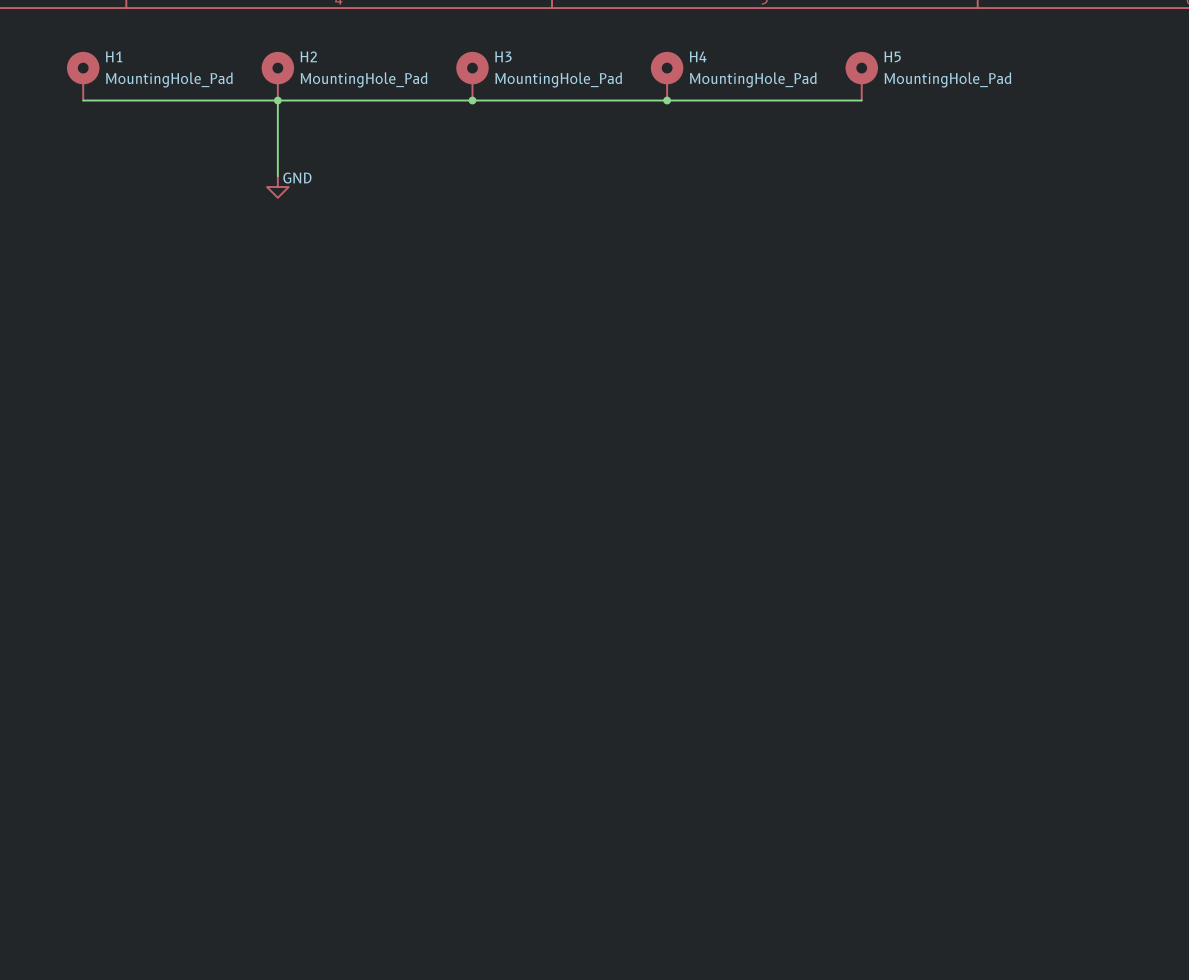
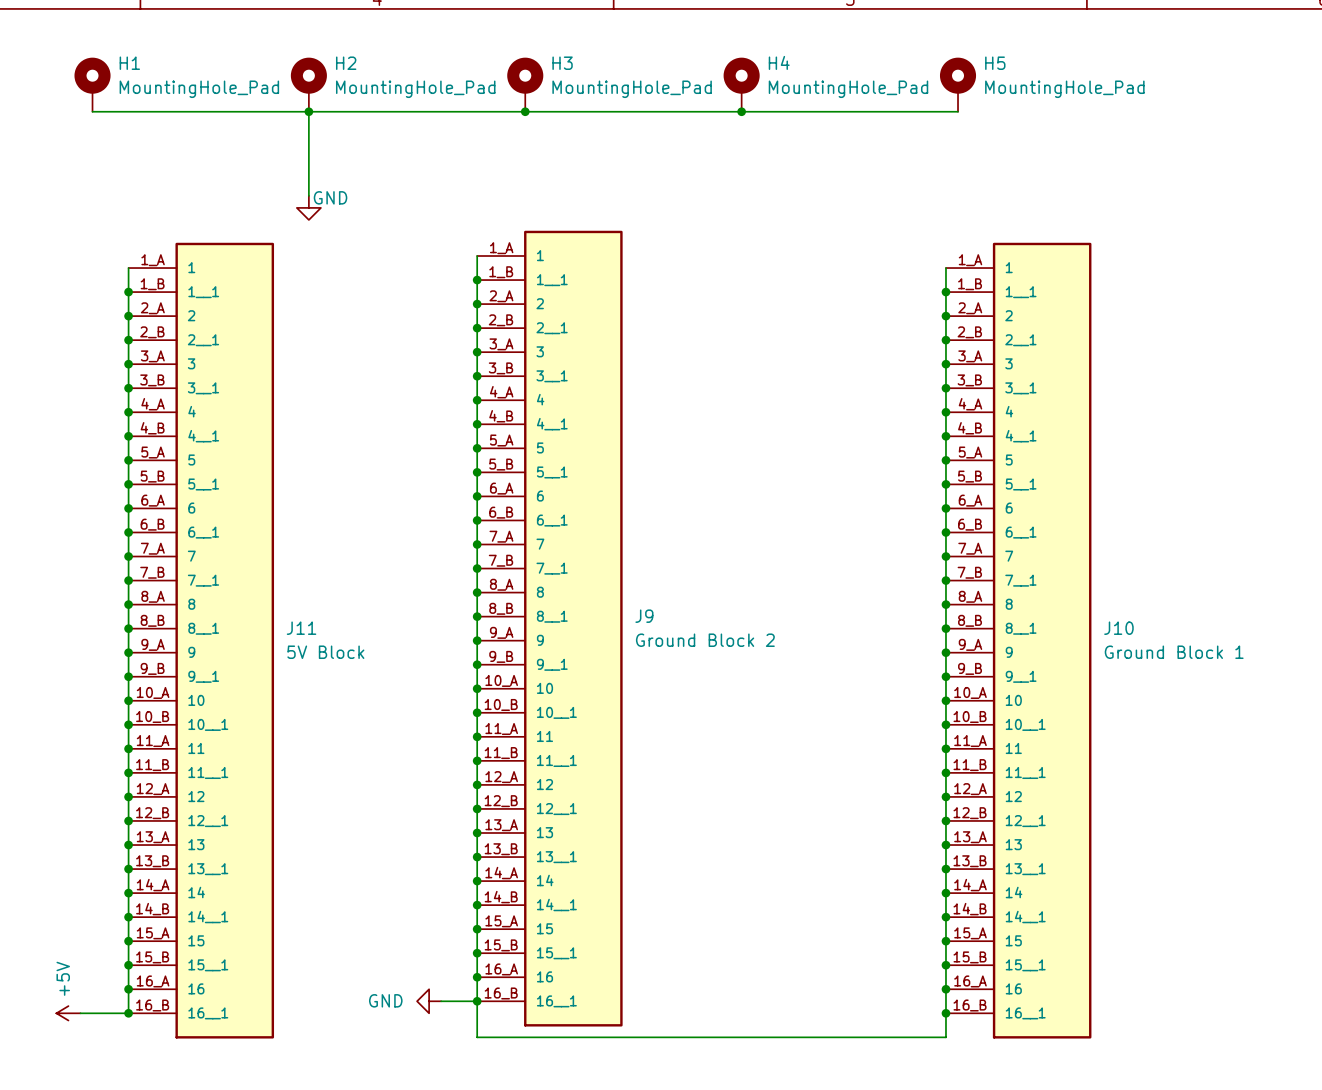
wire: none -> (477, 256) (477, 1037) (945, 1037) (945, 268)
wire: none -> (128, 268) (128, 1013) (80, 1013)
junction: none -> (477, 280)
junction: none -> (128, 292)
junction: none -> (945, 292)
junction: none -> (477, 304)
junction: none -> (128, 316)
junction: none -> (945, 316)
junction: none -> (477, 328)
junction: none -> (128, 340)
junction: none -> (945, 340)
junction: none -> (477, 352)
junction: none -> (128, 364)
junction: none -> (945, 364)
junction: none -> (477, 376)
junction: none -> (128, 388)
junction: none -> (945, 388)
junction: none -> (477, 400)
junction: none -> (128, 412)
junction: none -> (945, 412)
junction: none -> (477, 424)
junction: none -> (128, 436)
junction: none -> (945, 436)
junction: none -> (477, 448)
junction: none -> (128, 460)
junction: none -> (945, 460)
junction: none -> (477, 472)
junction: none -> (128, 484)
junction: none -> (945, 484)
junction: none -> (477, 496)
junction: none -> (128, 508)
junction: none -> (945, 508)
junction: none -> (477, 520)
junction: none -> (128, 532)
junction: none -> (945, 532)
junction: none -> (477, 544)
junction: none -> (128, 556)
junction: none -> (945, 556)
junction: none -> (477, 568)
junction: none -> (128, 580)
junction: none -> (945, 580)
junction: none -> (477, 592)
junction: none -> (128, 604)
junction: none -> (945, 604)
junction: none -> (477, 616)
junction: none -> (128, 628)
J9: none -> Ground Block 2 (549, 628)
junction: none -> (945, 628)
J11: none -> 5V Block (201, 640)
junction: none -> (477, 640)
J10: none -> Ground Block 1 (1018, 640)
junction: none -> (128, 652)
junction: none -> (945, 652)
junction: none -> (477, 664)
junction: none -> (128, 676)
junction: none -> (945, 676)
junction: none -> (477, 688)
junction: none -> (128, 700)
junction: none -> (945, 700)
junction: none -> (477, 712)
junction: none -> (128, 724)
junction: none -> (945, 724)
junction: none -> (477, 736)
junction: none -> (128, 748)
junction: none -> (945, 748)
junction: none -> (477, 760)
junction: none -> (128, 772)
junction: none -> (945, 772)
junction: none -> (477, 784)
junction: none -> (128, 796)
junction: none -> (945, 796)
junction: none -> (477, 808)
junction: none -> (128, 820)
junction: none -> (945, 820)
junction: none -> (477, 832)
junction: none -> (128, 845)
junction: none -> (945, 845)
junction: none -> (477, 857)
junction: none -> (128, 869)
junction: none -> (945, 869)
junction: none -> (477, 881)
junction: none -> (128, 893)
junction: none -> (945, 893)
junction: none -> (477, 905)
junction: none -> (128, 917)
junction: none -> (945, 917)
junction: none -> (477, 929)
junction: none -> (128, 941)
junction: none -> (945, 941)
junction: none -> (477, 953)
junction: none -> (128, 965)
junction: none -> (945, 965)
junction: none -> (477, 977)
junction: none -> (128, 989)
junction: none -> (945, 989)
power symbol: none -> GND (429, 1001)
wire: none -> (441, 1001) (477, 1001)
junction: none -> (477, 1001)
power symbol: none -> +5V (68, 1013)
junction: none -> (128, 1013)
junction: none -> (945, 1013)

